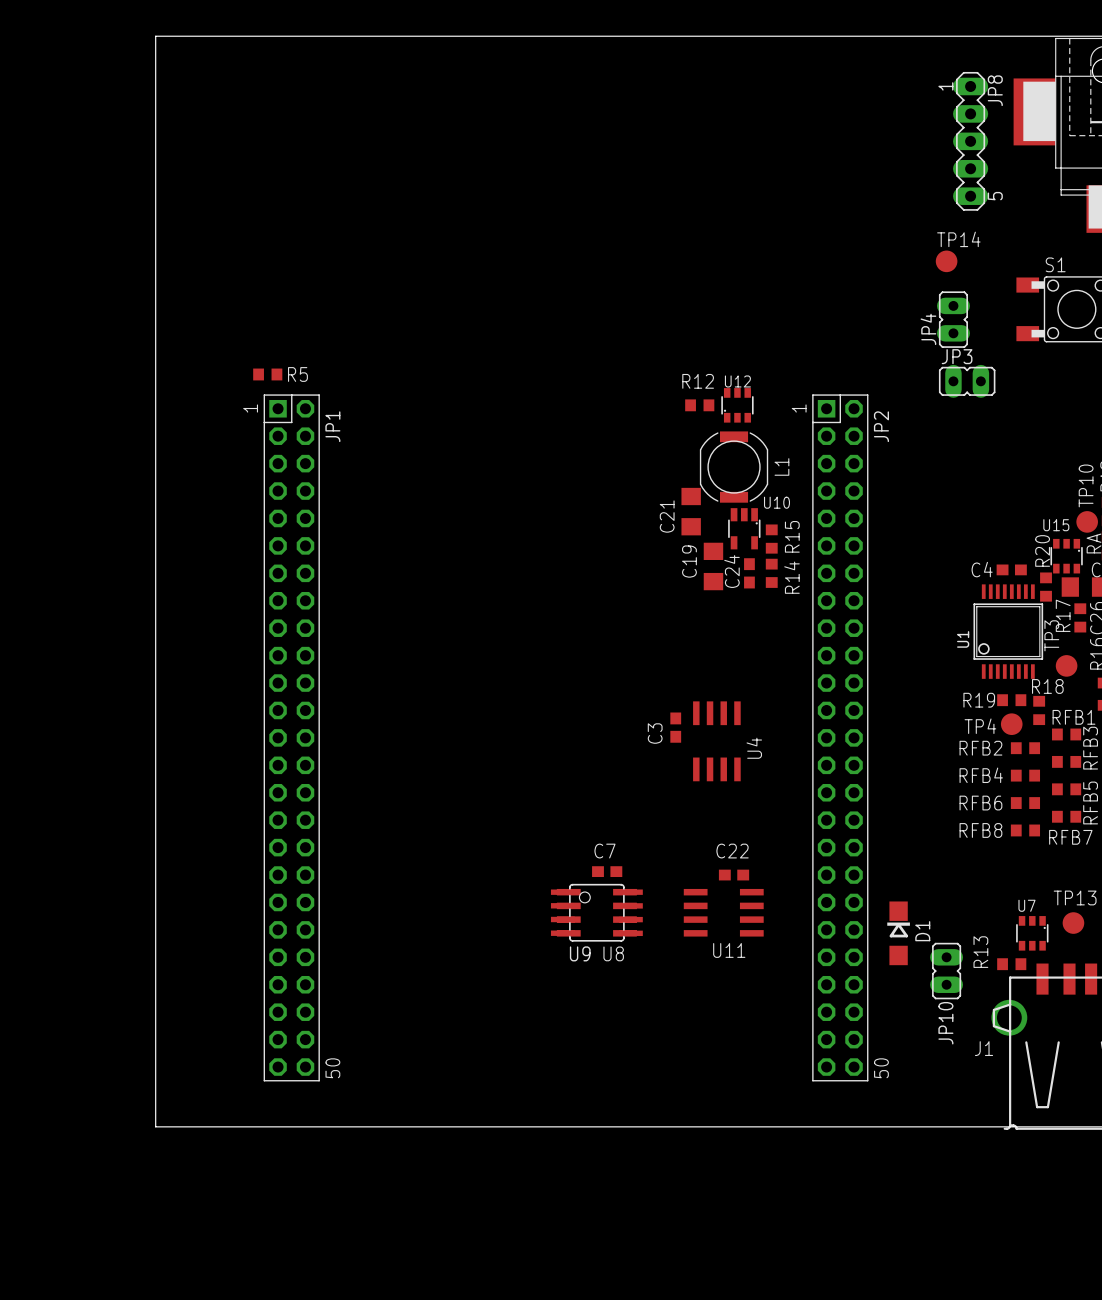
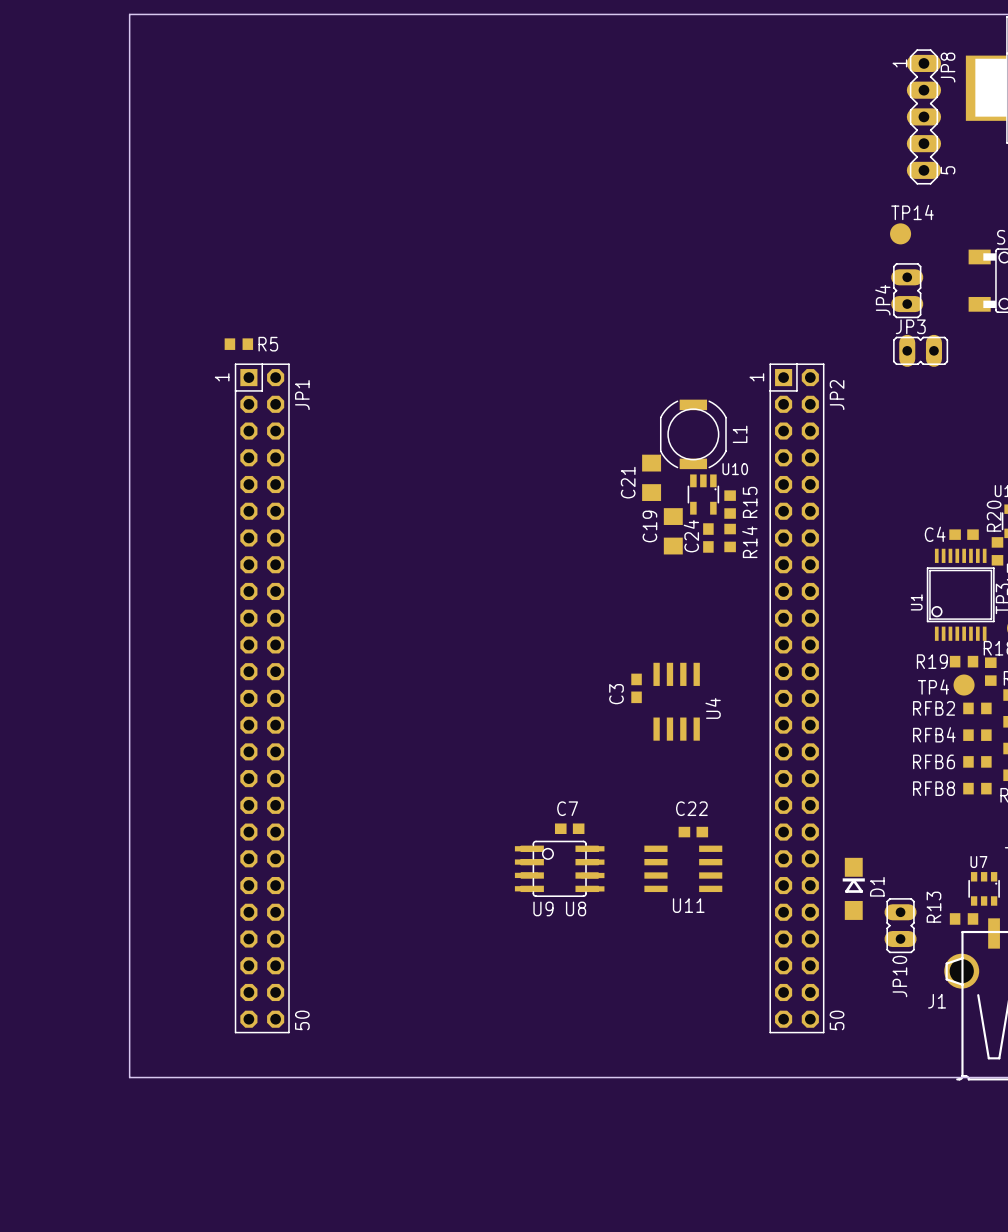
R12: (699, 405) -> none
U12: (737, 405) -> none

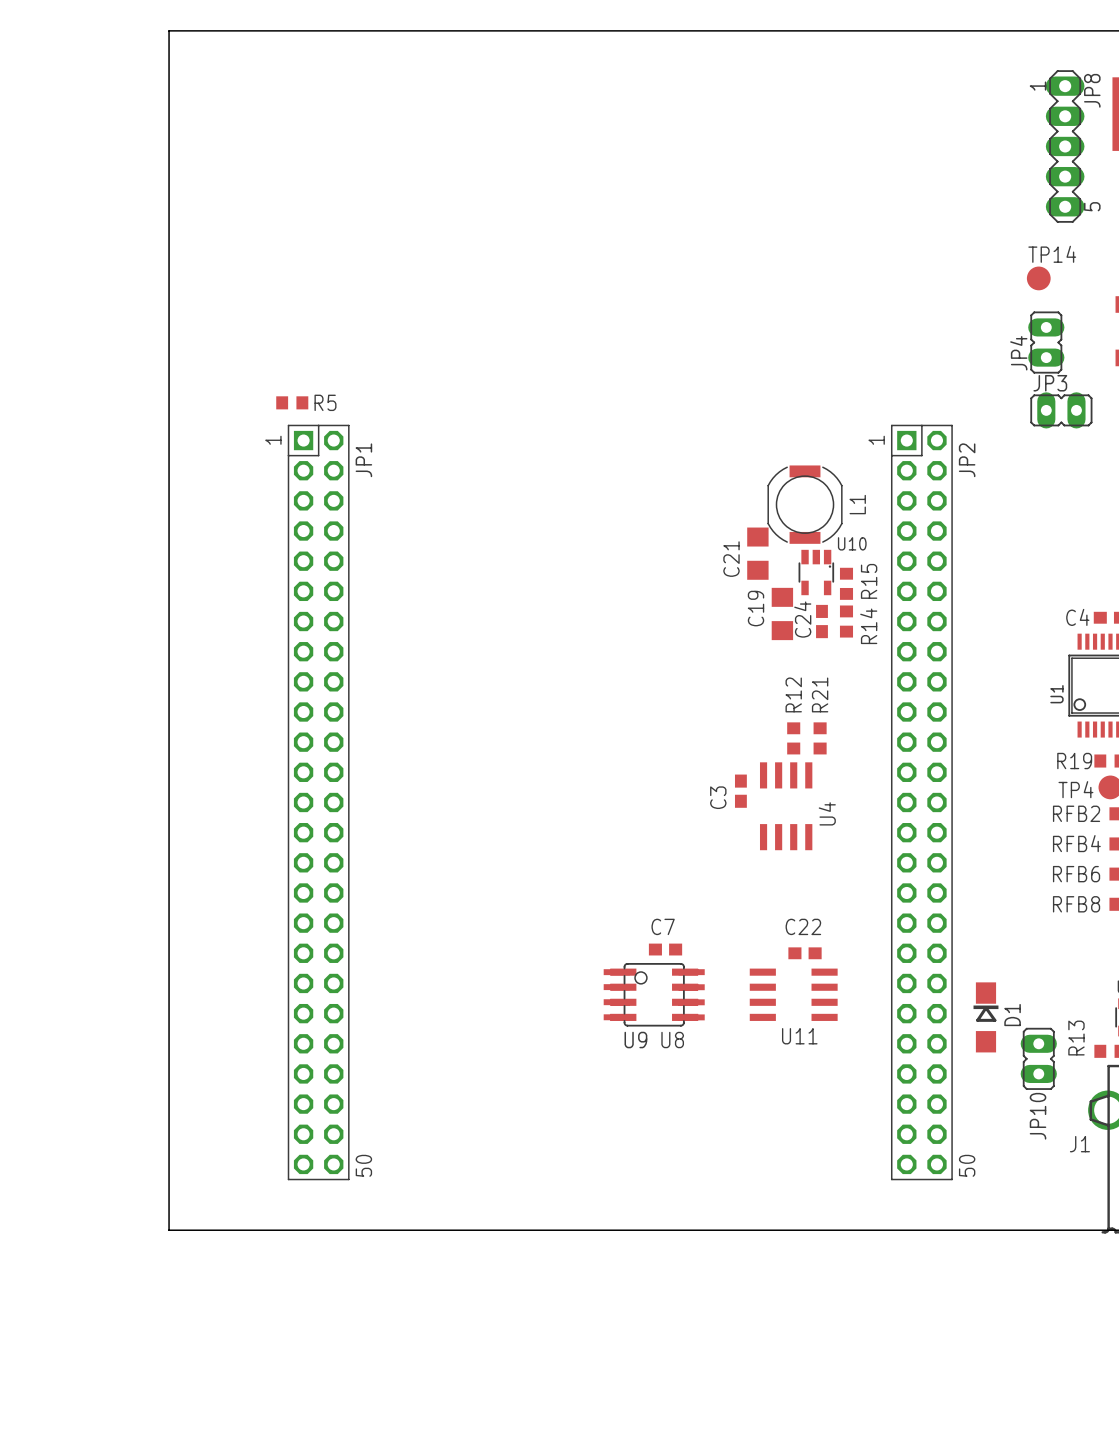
R12: none -> (793, 738)
R21: none -> (820, 738)

